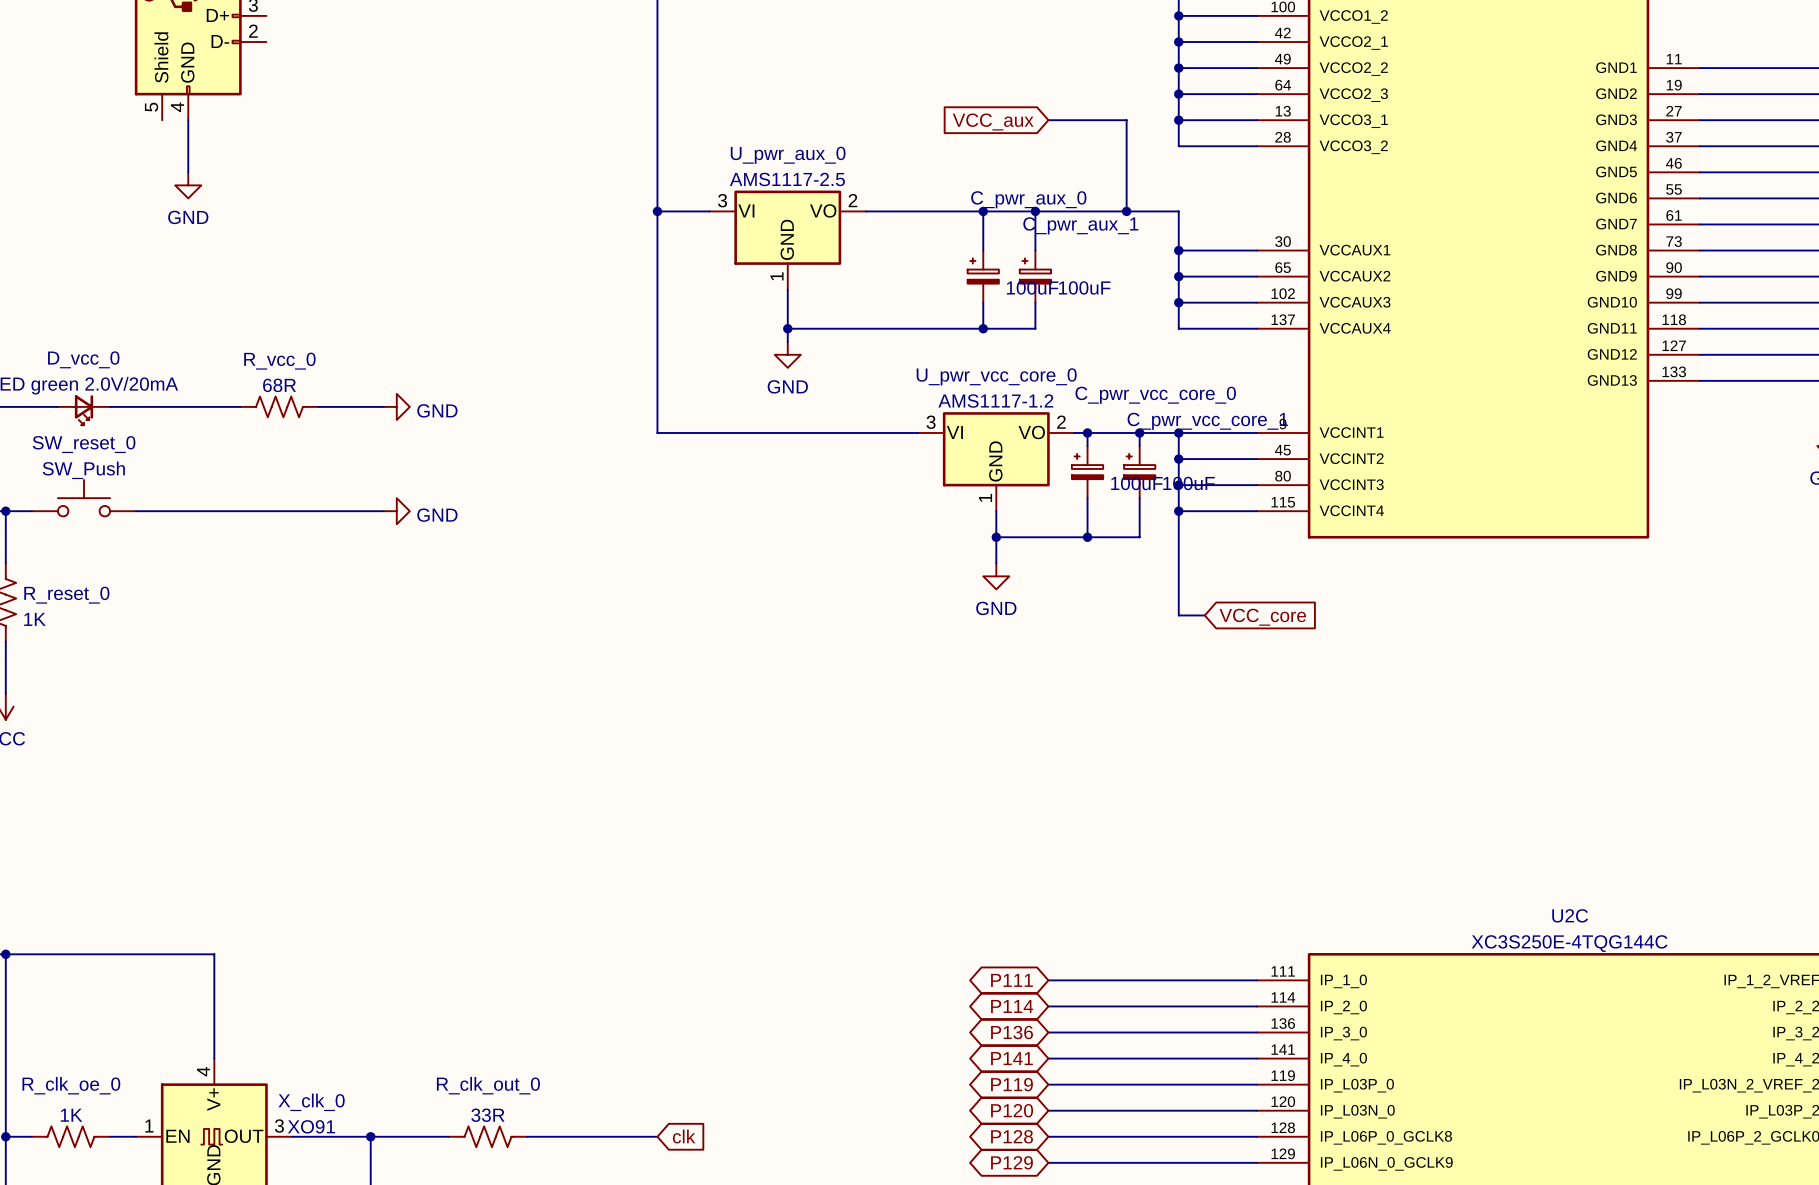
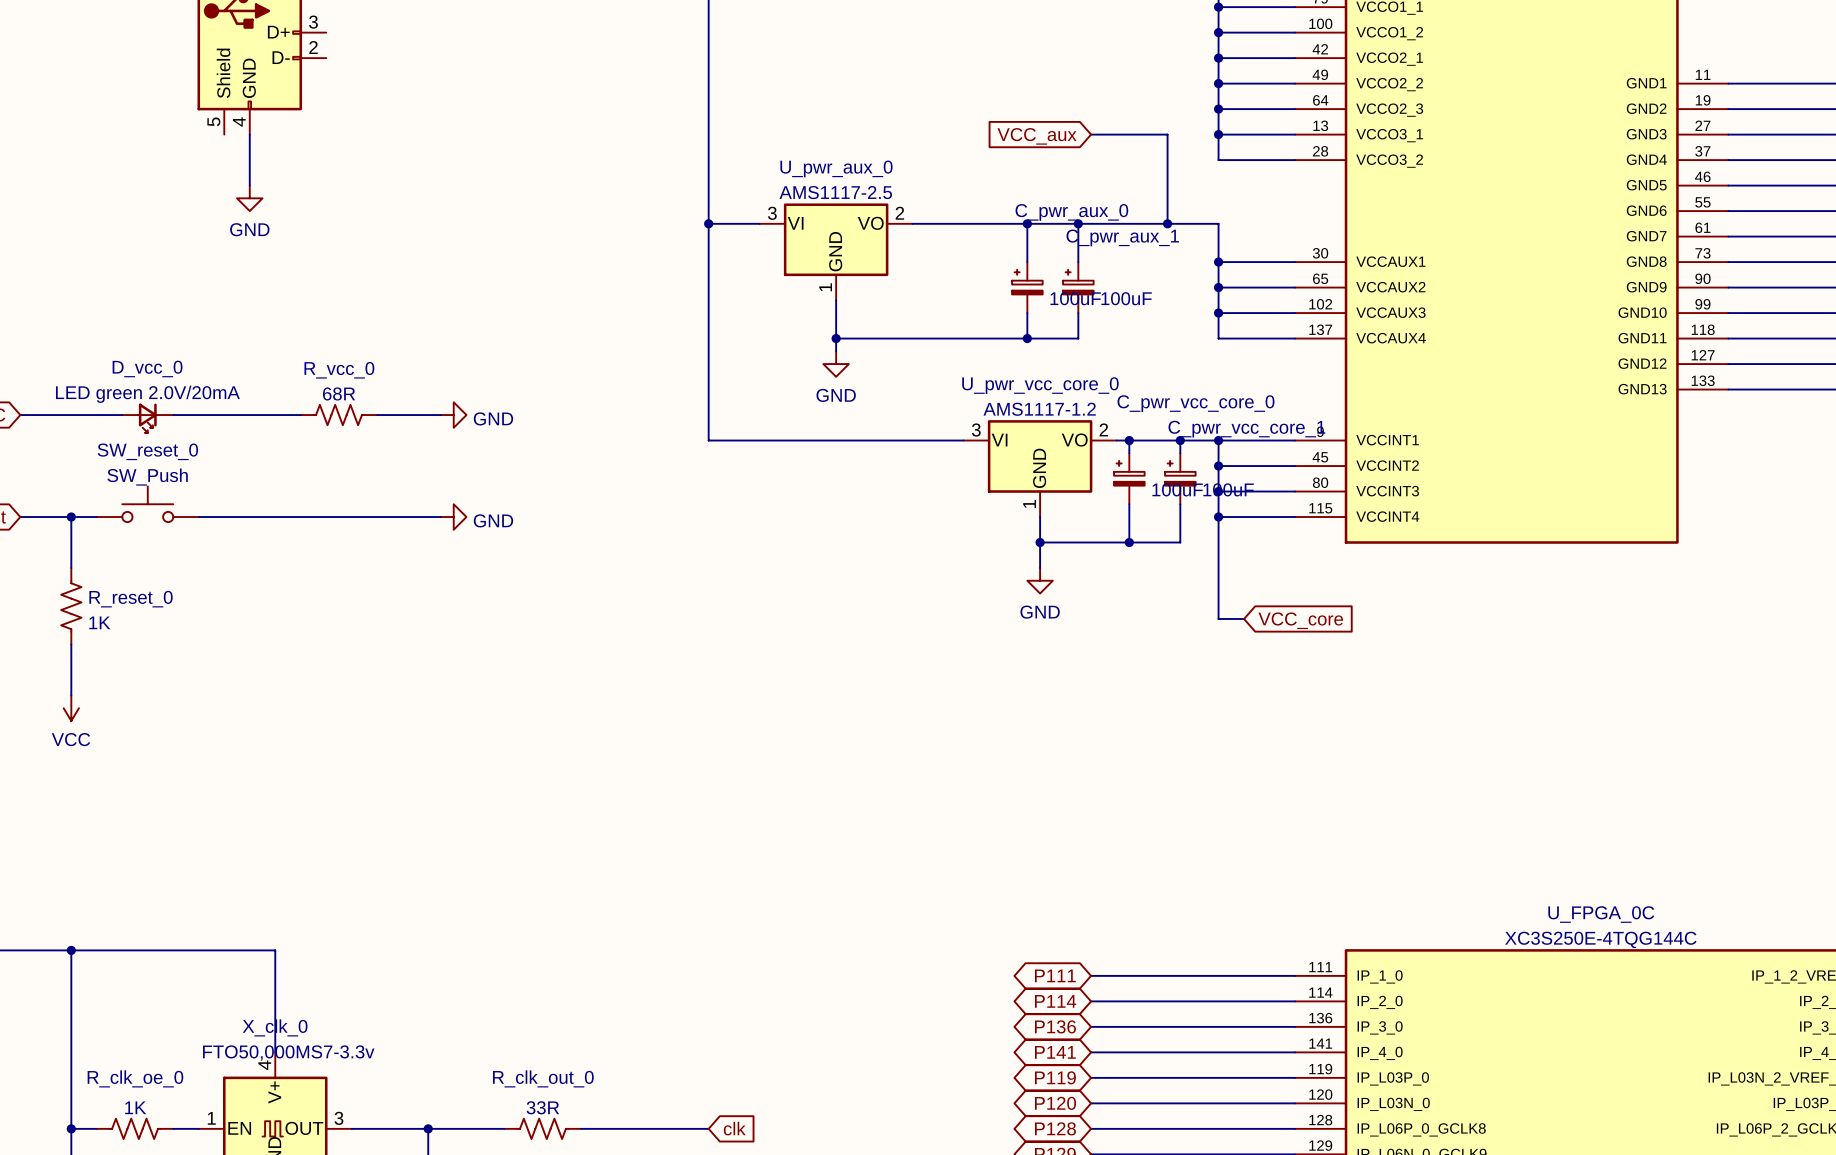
U2C name: U2C (1570, 915) -> U_FPGA_0C (1601, 914)
X_clk_0 name position: X_clk_0 (311, 1102) -> X_clk_0 (275, 1027)
X_clk_0 value: XO91 (311, 1126) -> FTO50,000MS7-3.3v (288, 1053)

